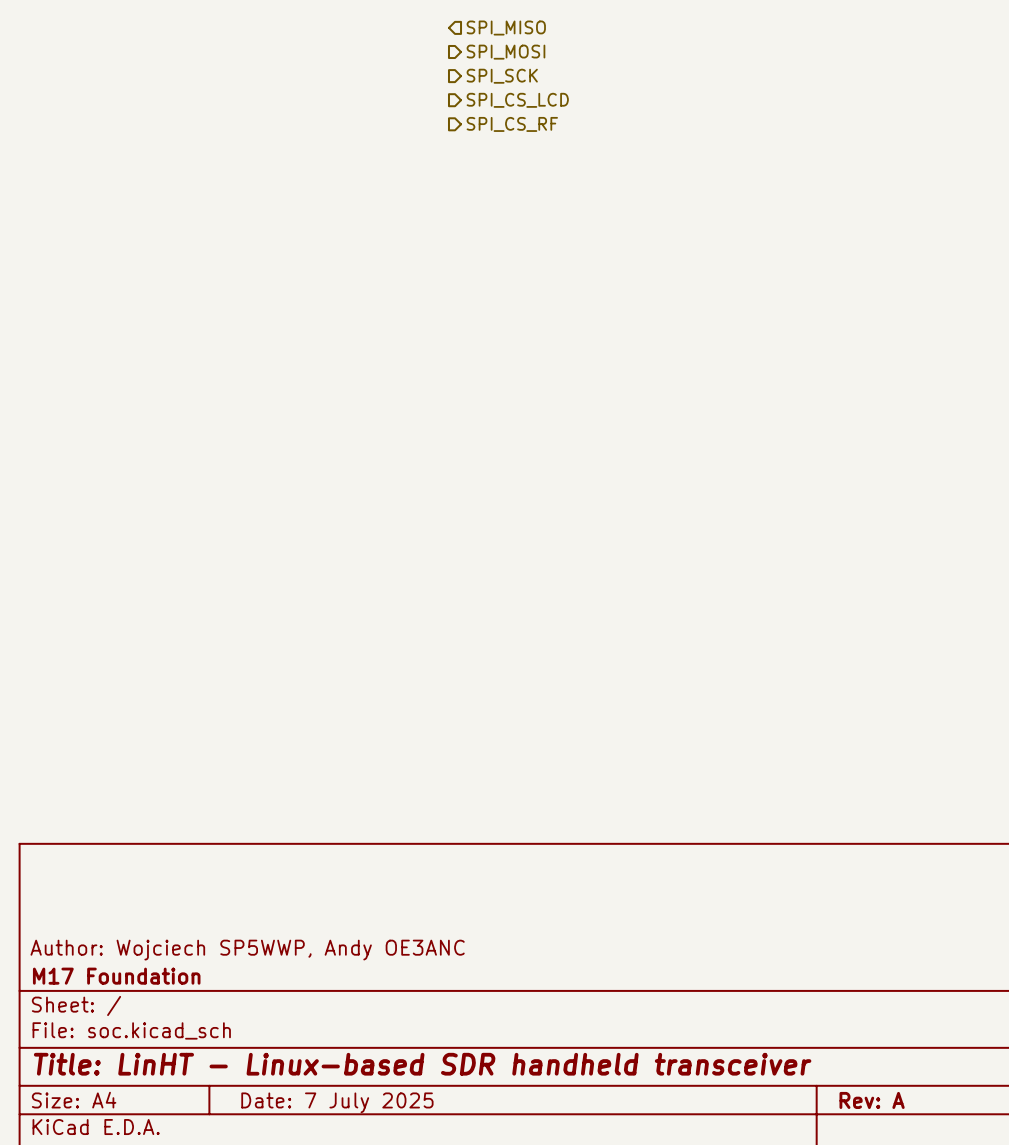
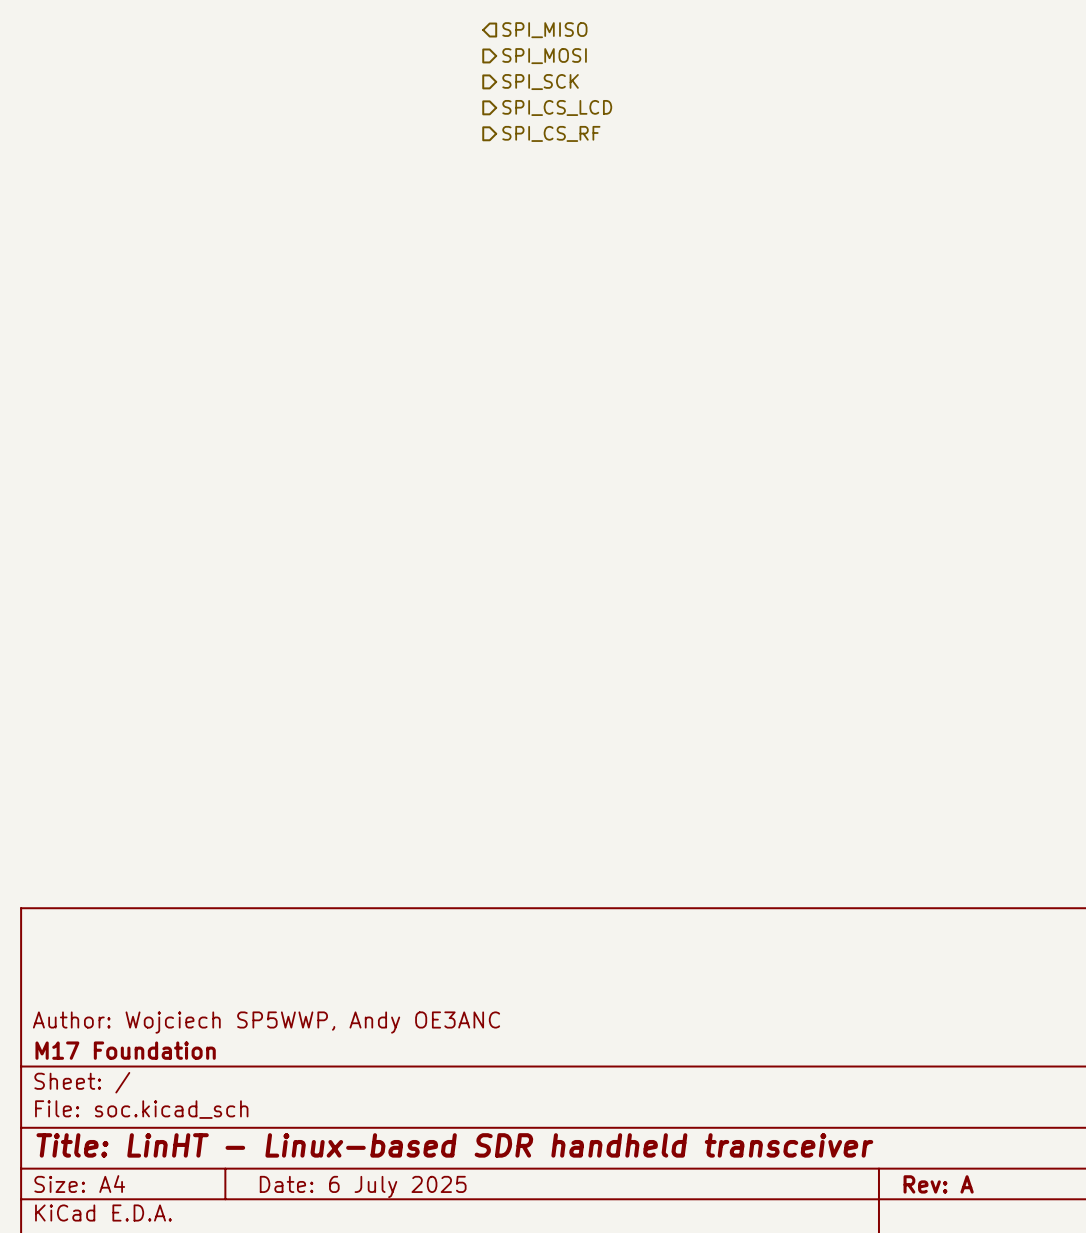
title block: Date: 7 July 2025 (337, 1102) -> Date: 6 July 2025 (363, 1186)

